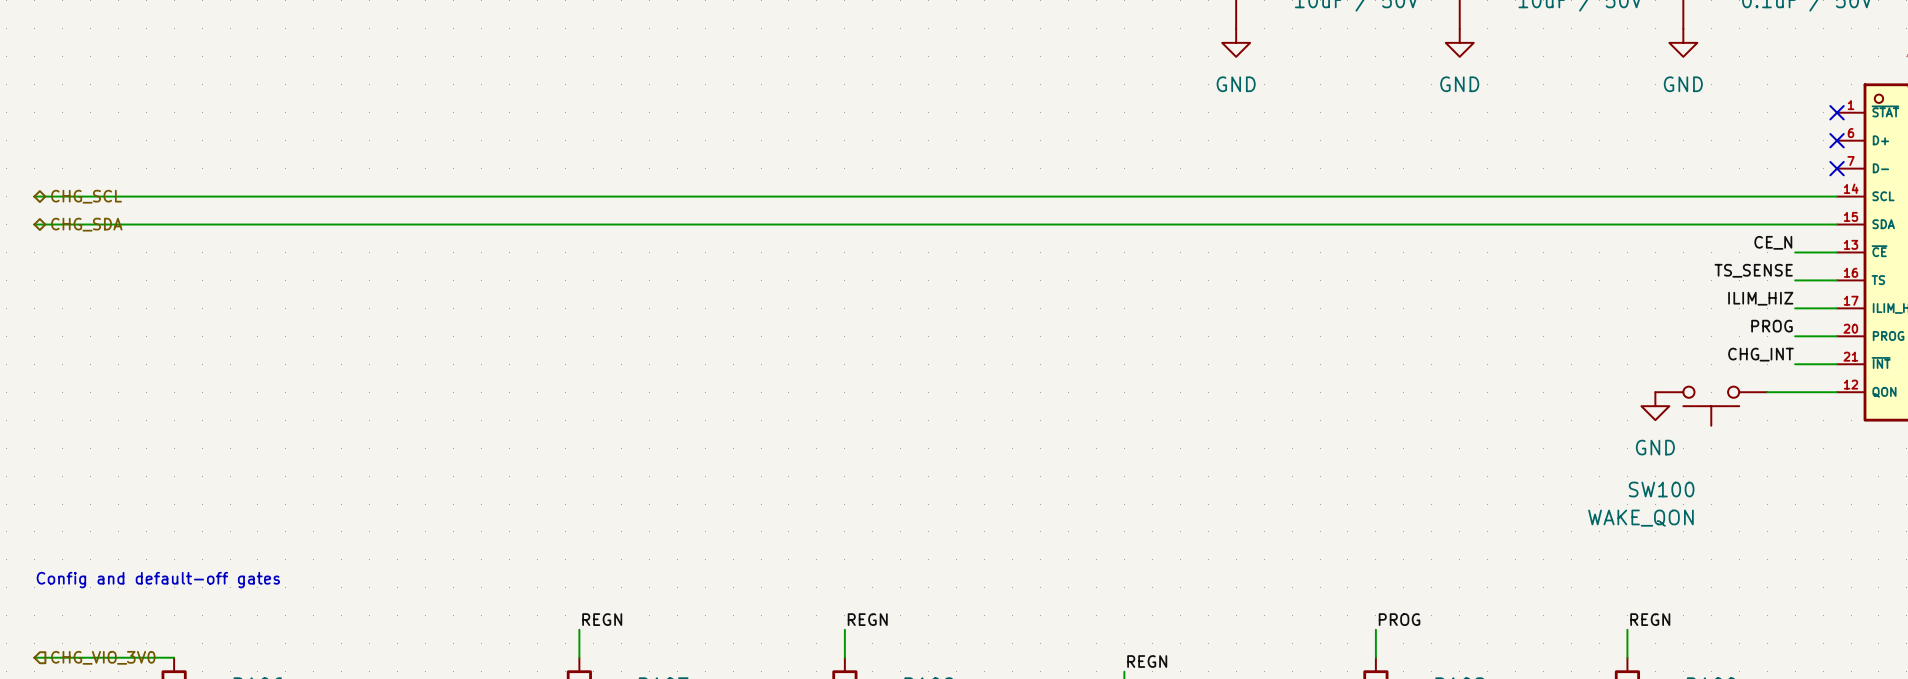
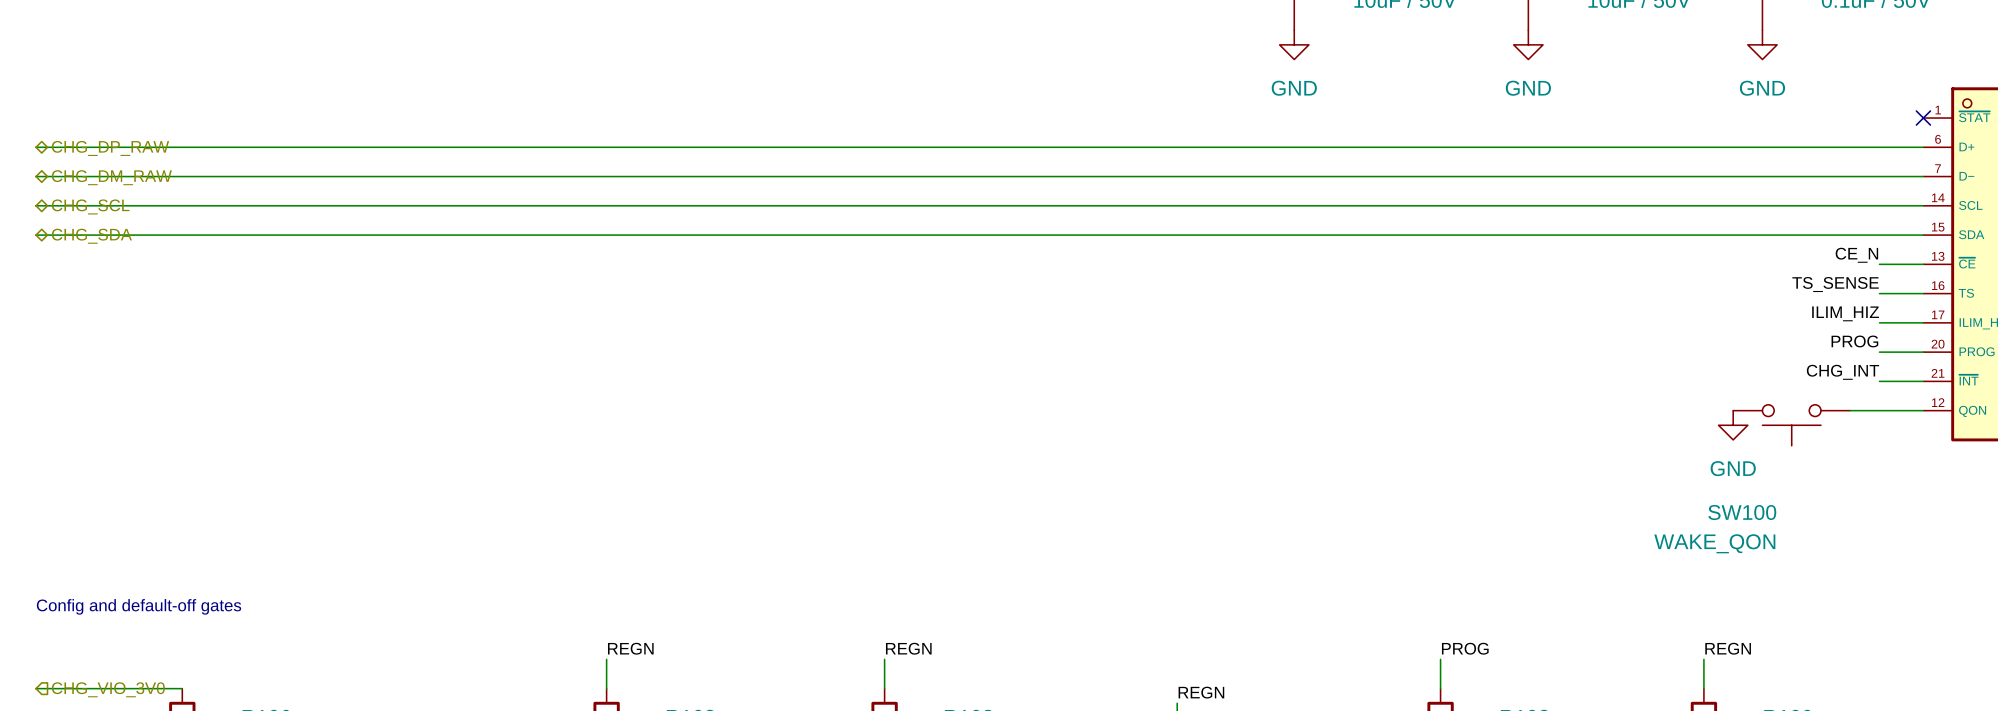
wire: none -> (35, 147) (1923, 147)
hierarchical label: none -> CHG_DP_RAW (110, 148)
no-connect mark: (1837, 140) -> none
wire: none -> (35, 176) (1923, 176)
hierarchical label: none -> CHG_DM_RAW (111, 177)
no-connect mark: (1837, 168) -> none

